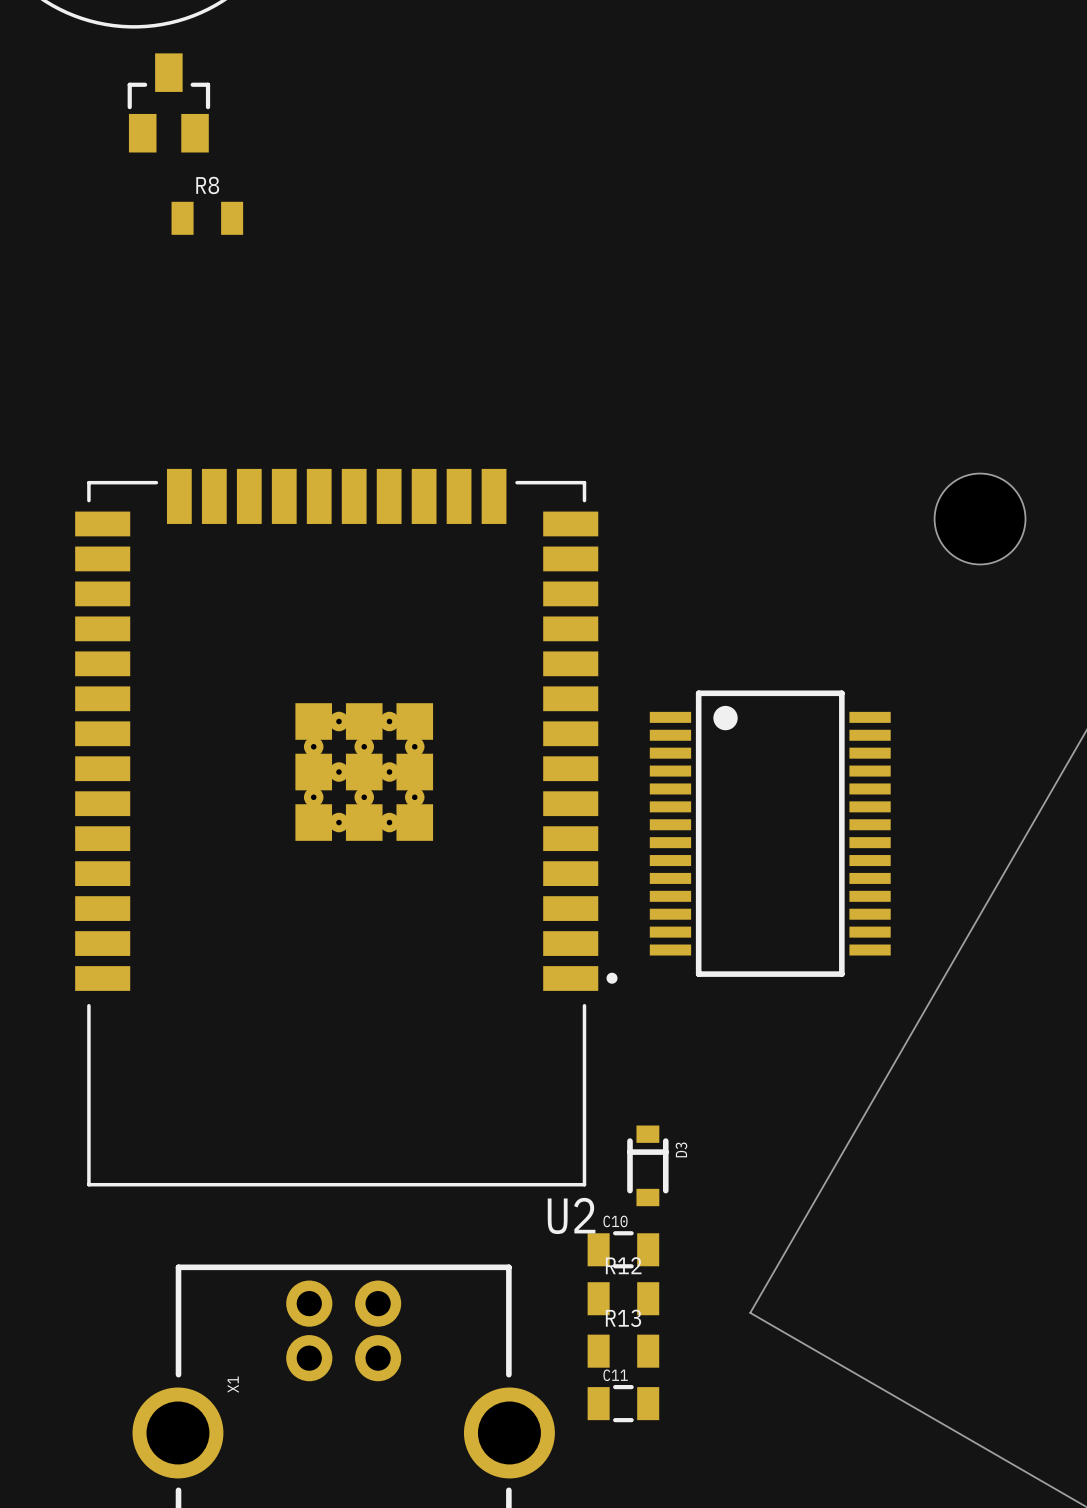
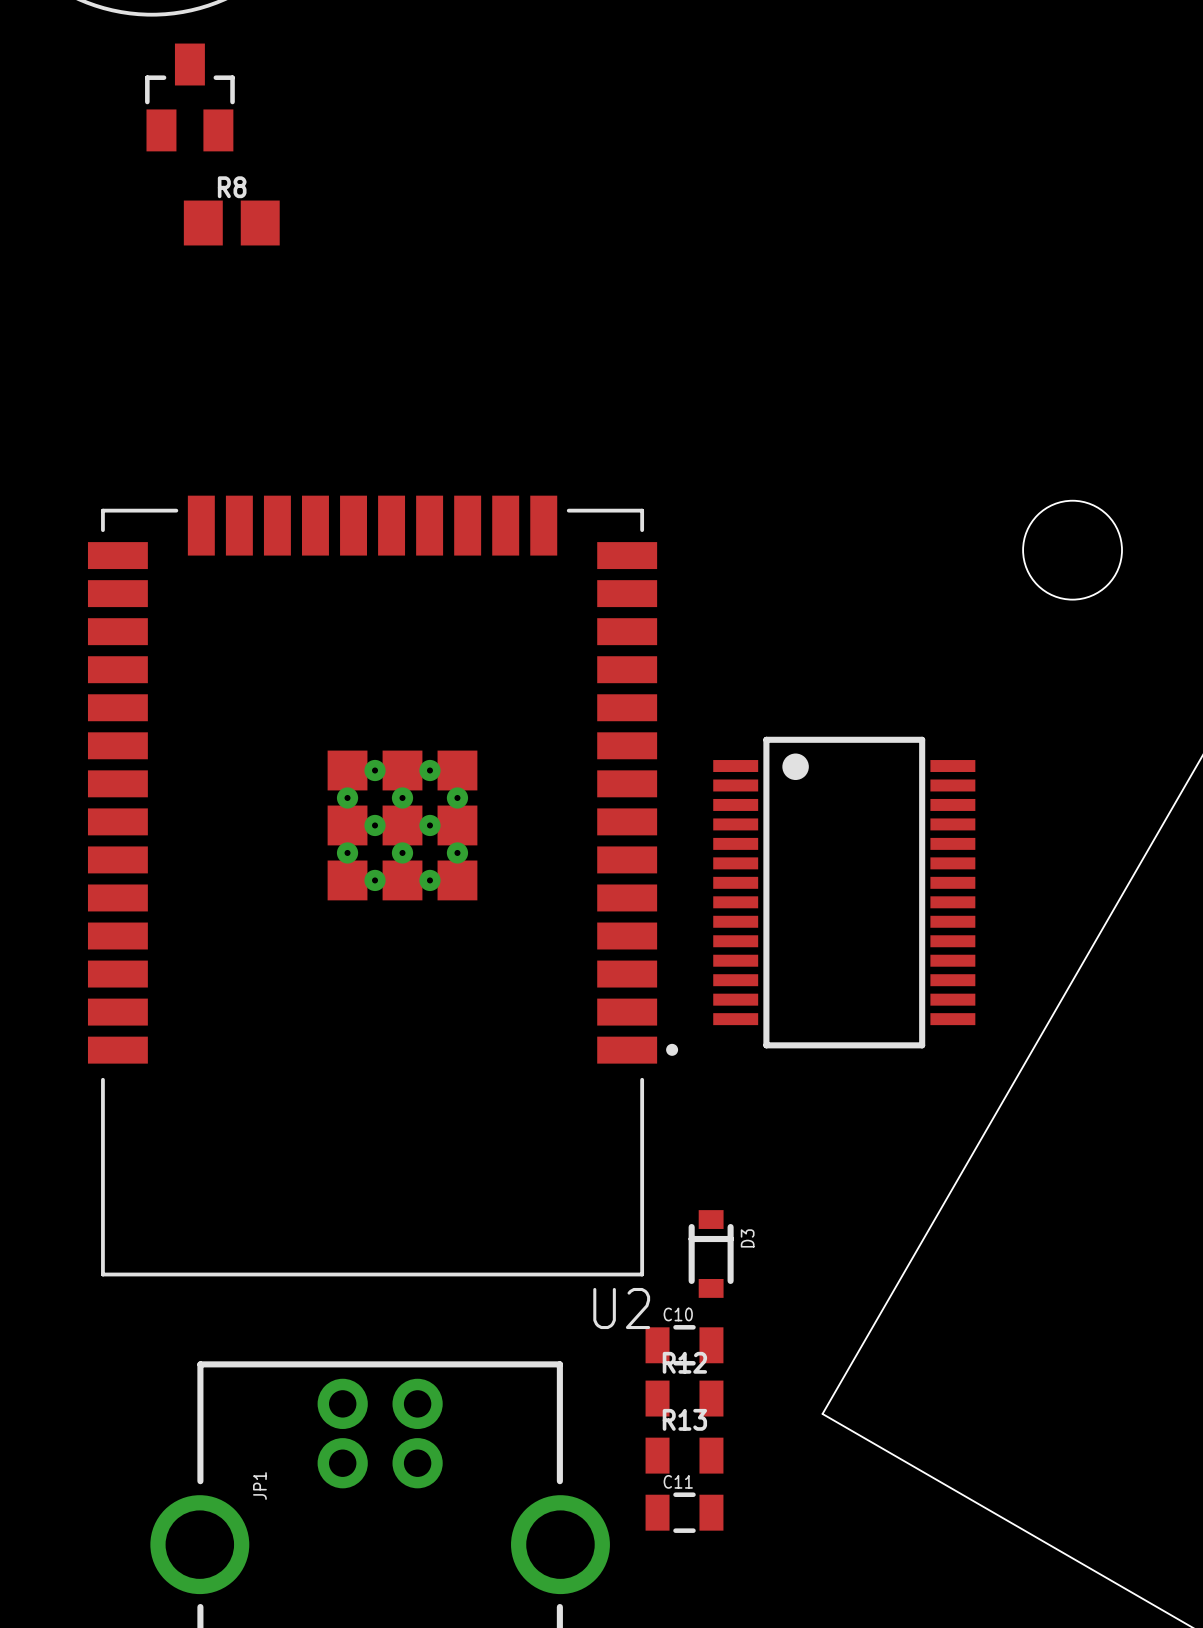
R8 footprint: [171, 201, 244, 235] -> [183, 200, 280, 246]
X1 name: X1 (233, 1384) -> JP1 (259, 1486)

